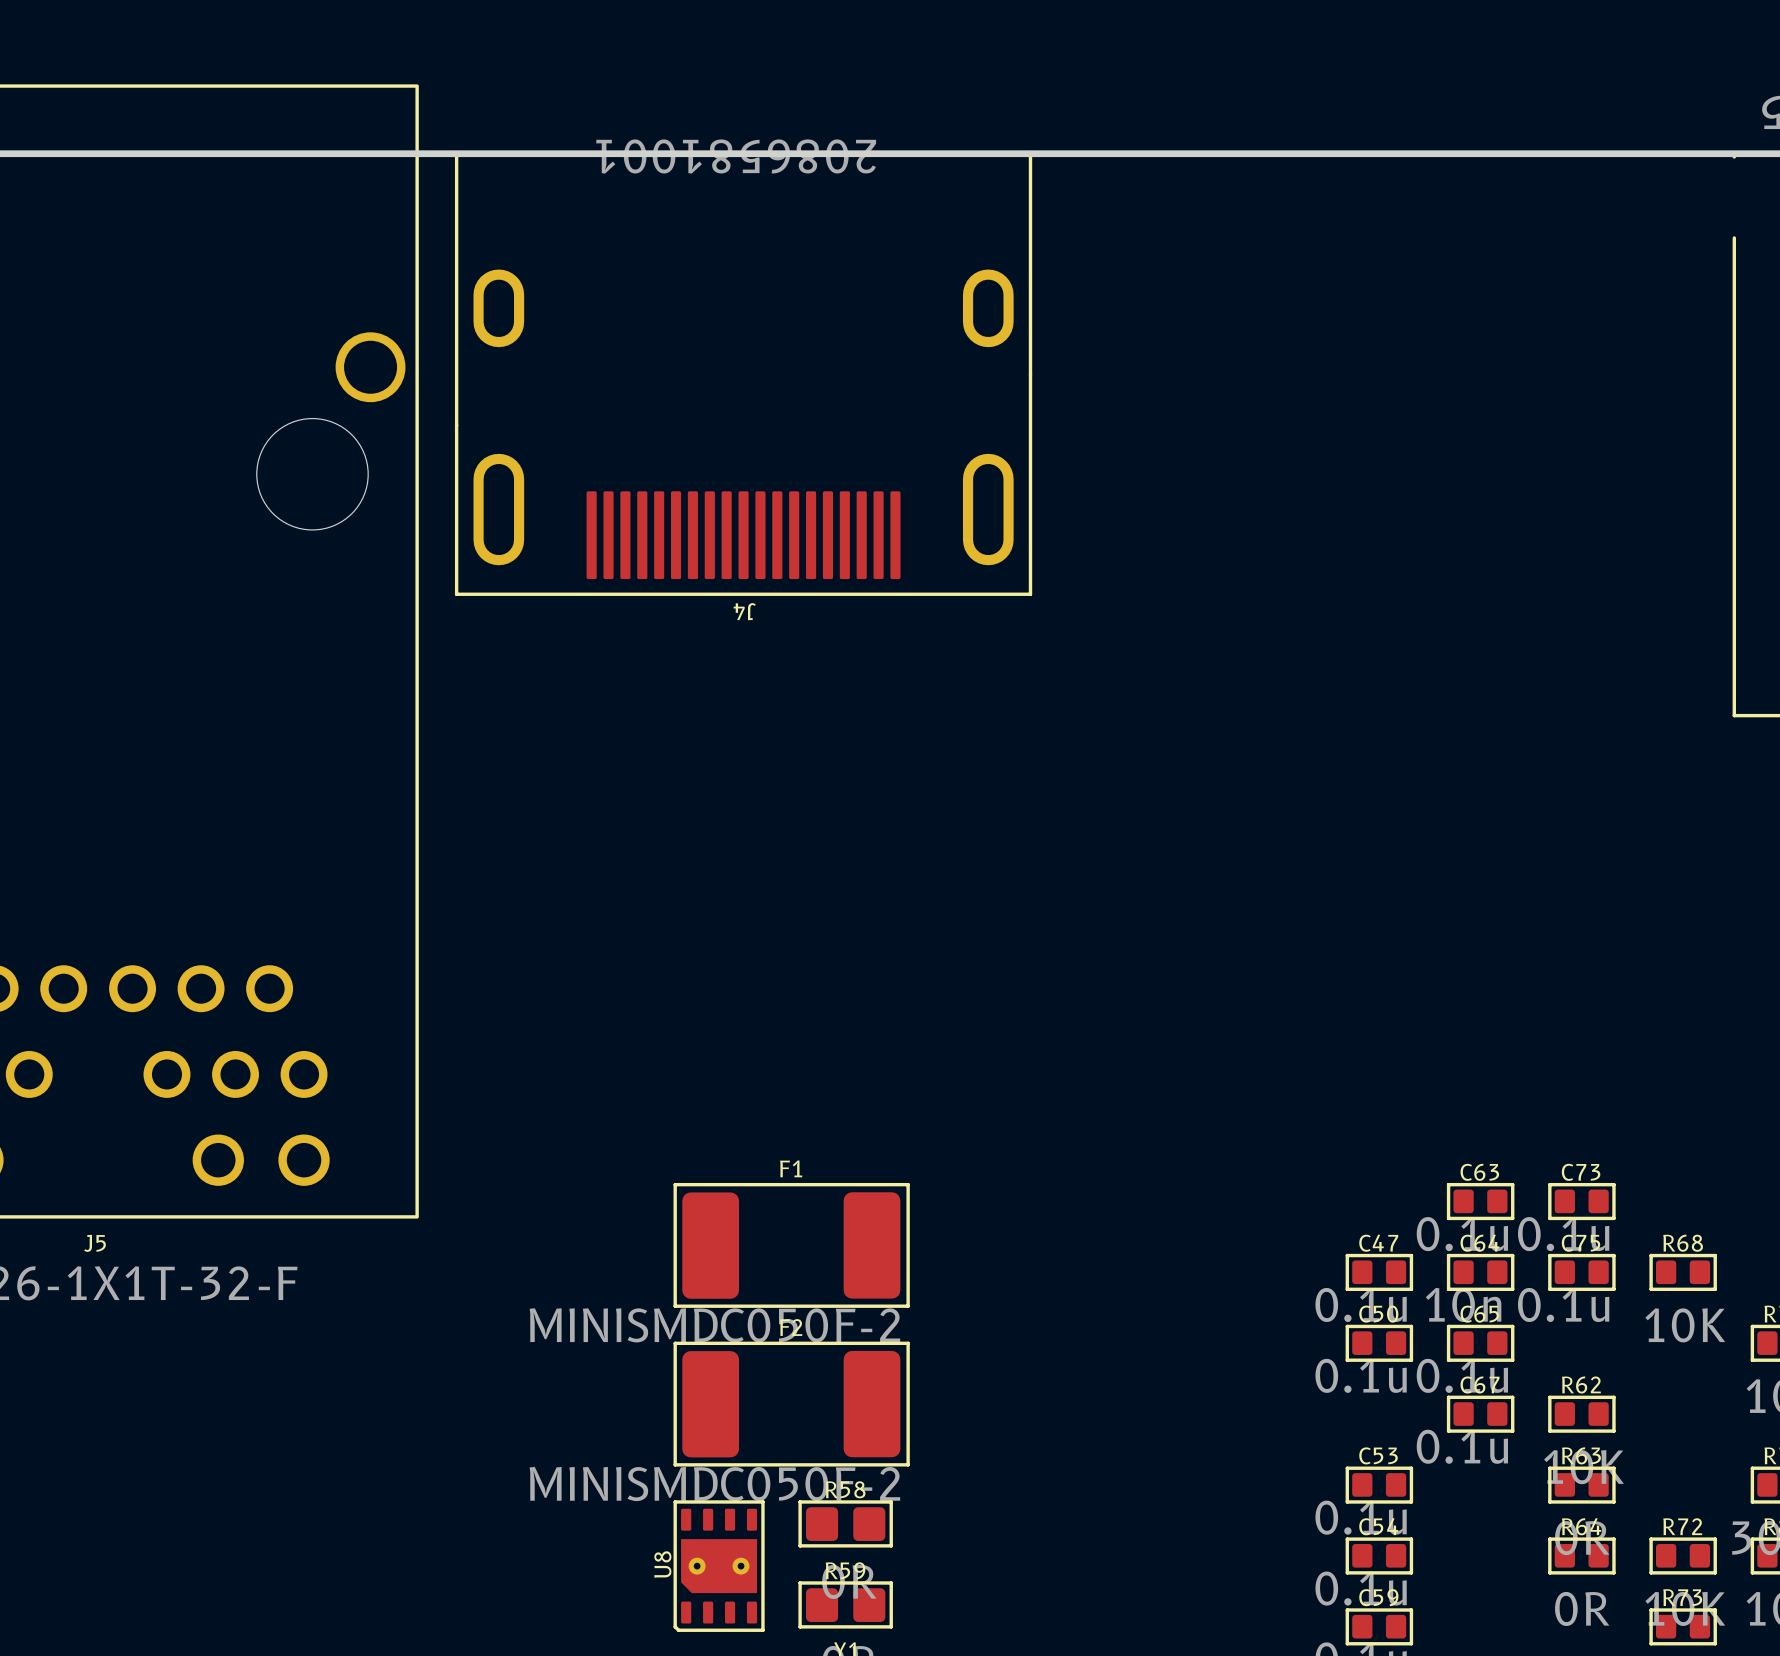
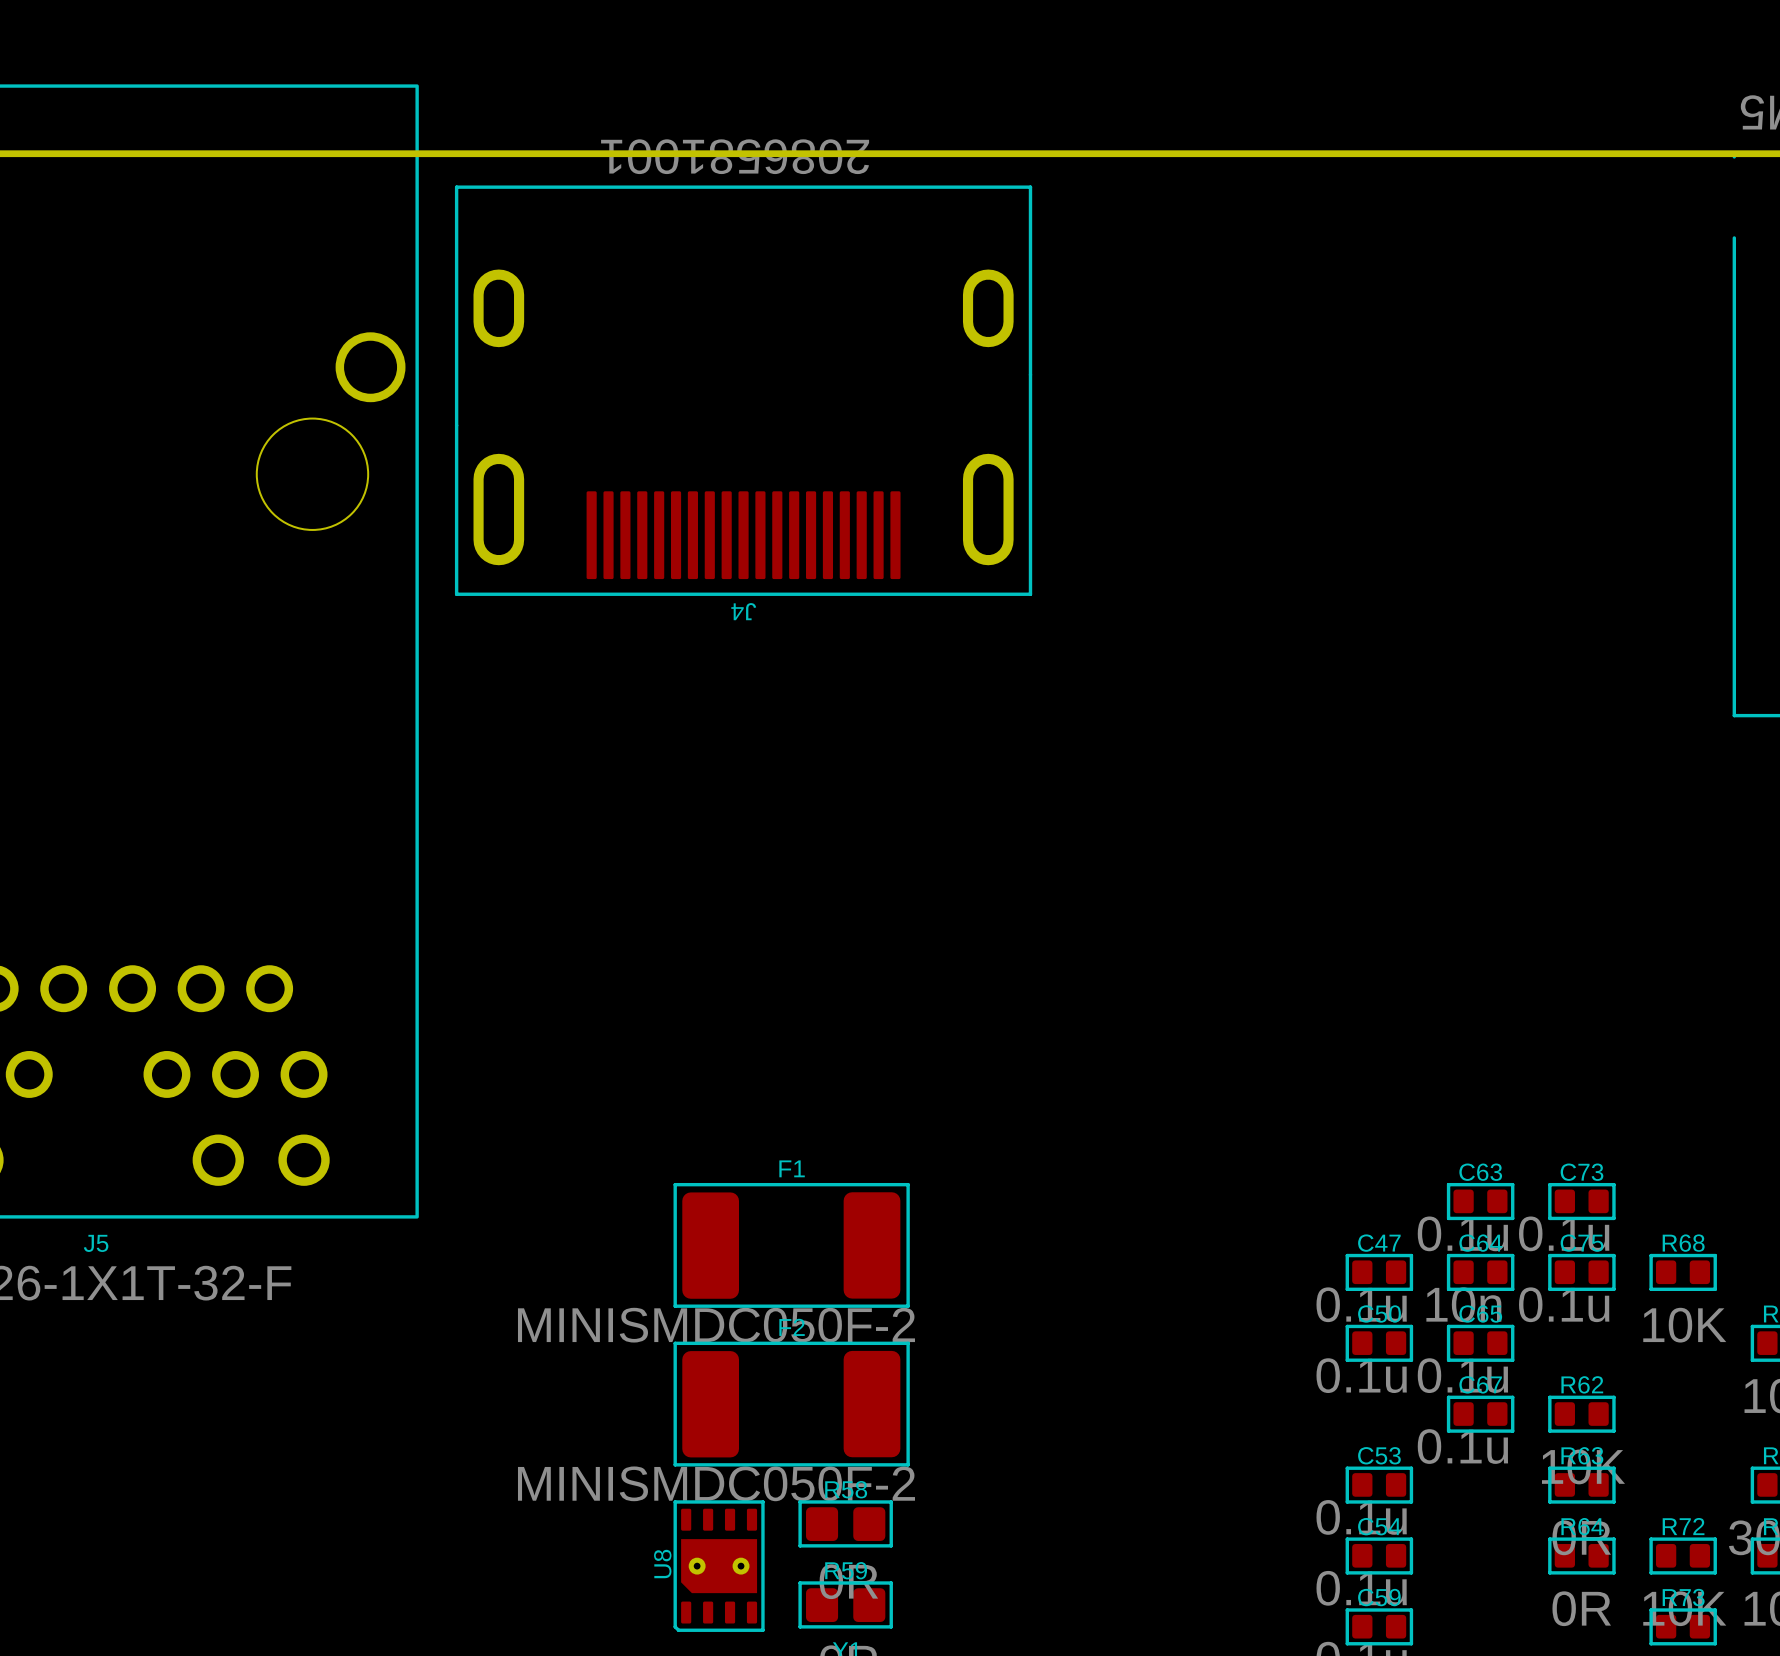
J4 footprint: [454, 151, 1033, 596] -> [454, 185, 1033, 596]

